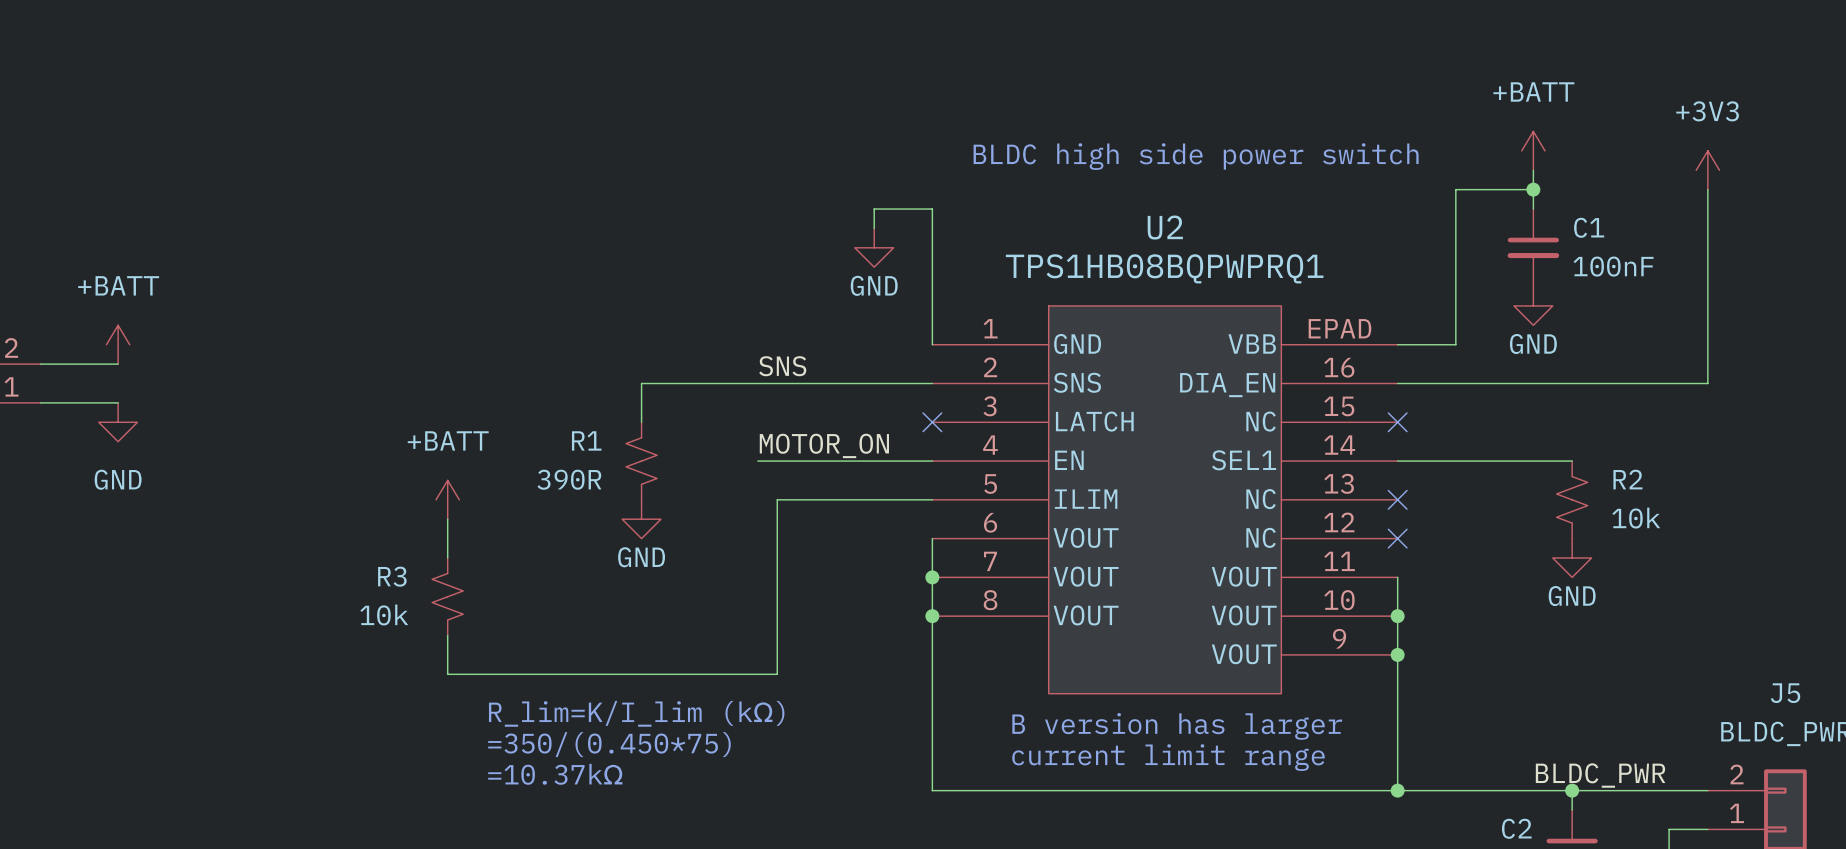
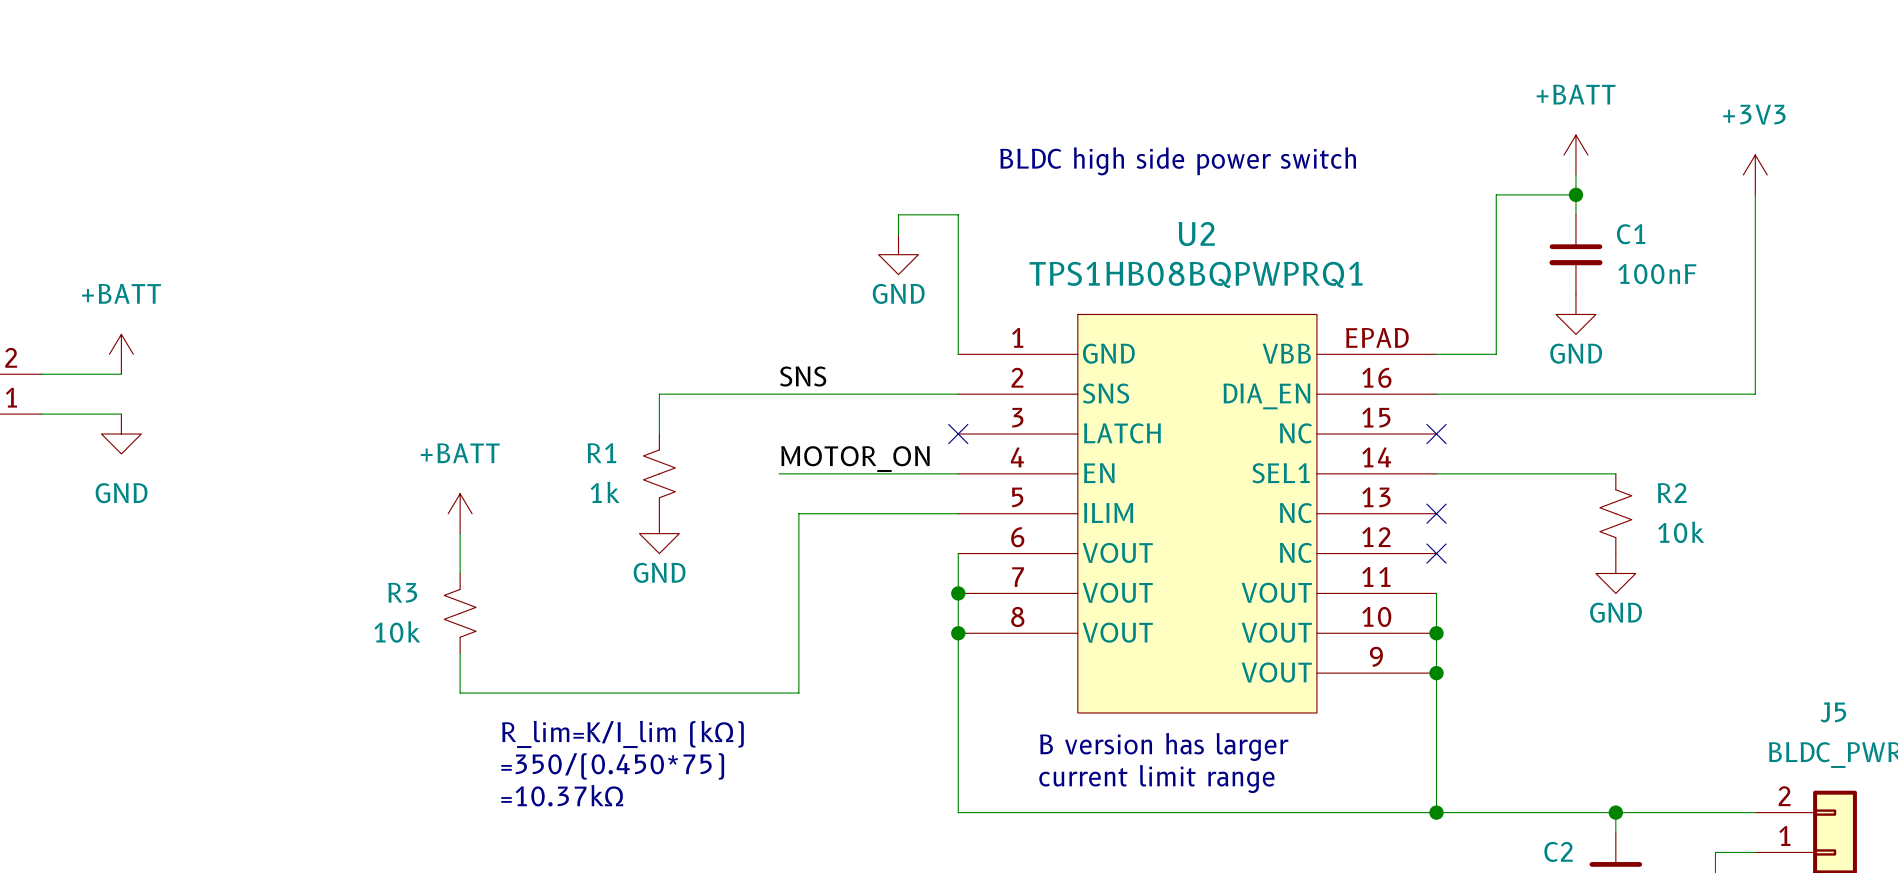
R1 value: 390R (569, 479) -> 1k (605, 492)
label: BLDC_PWR (1600, 775) -> none

